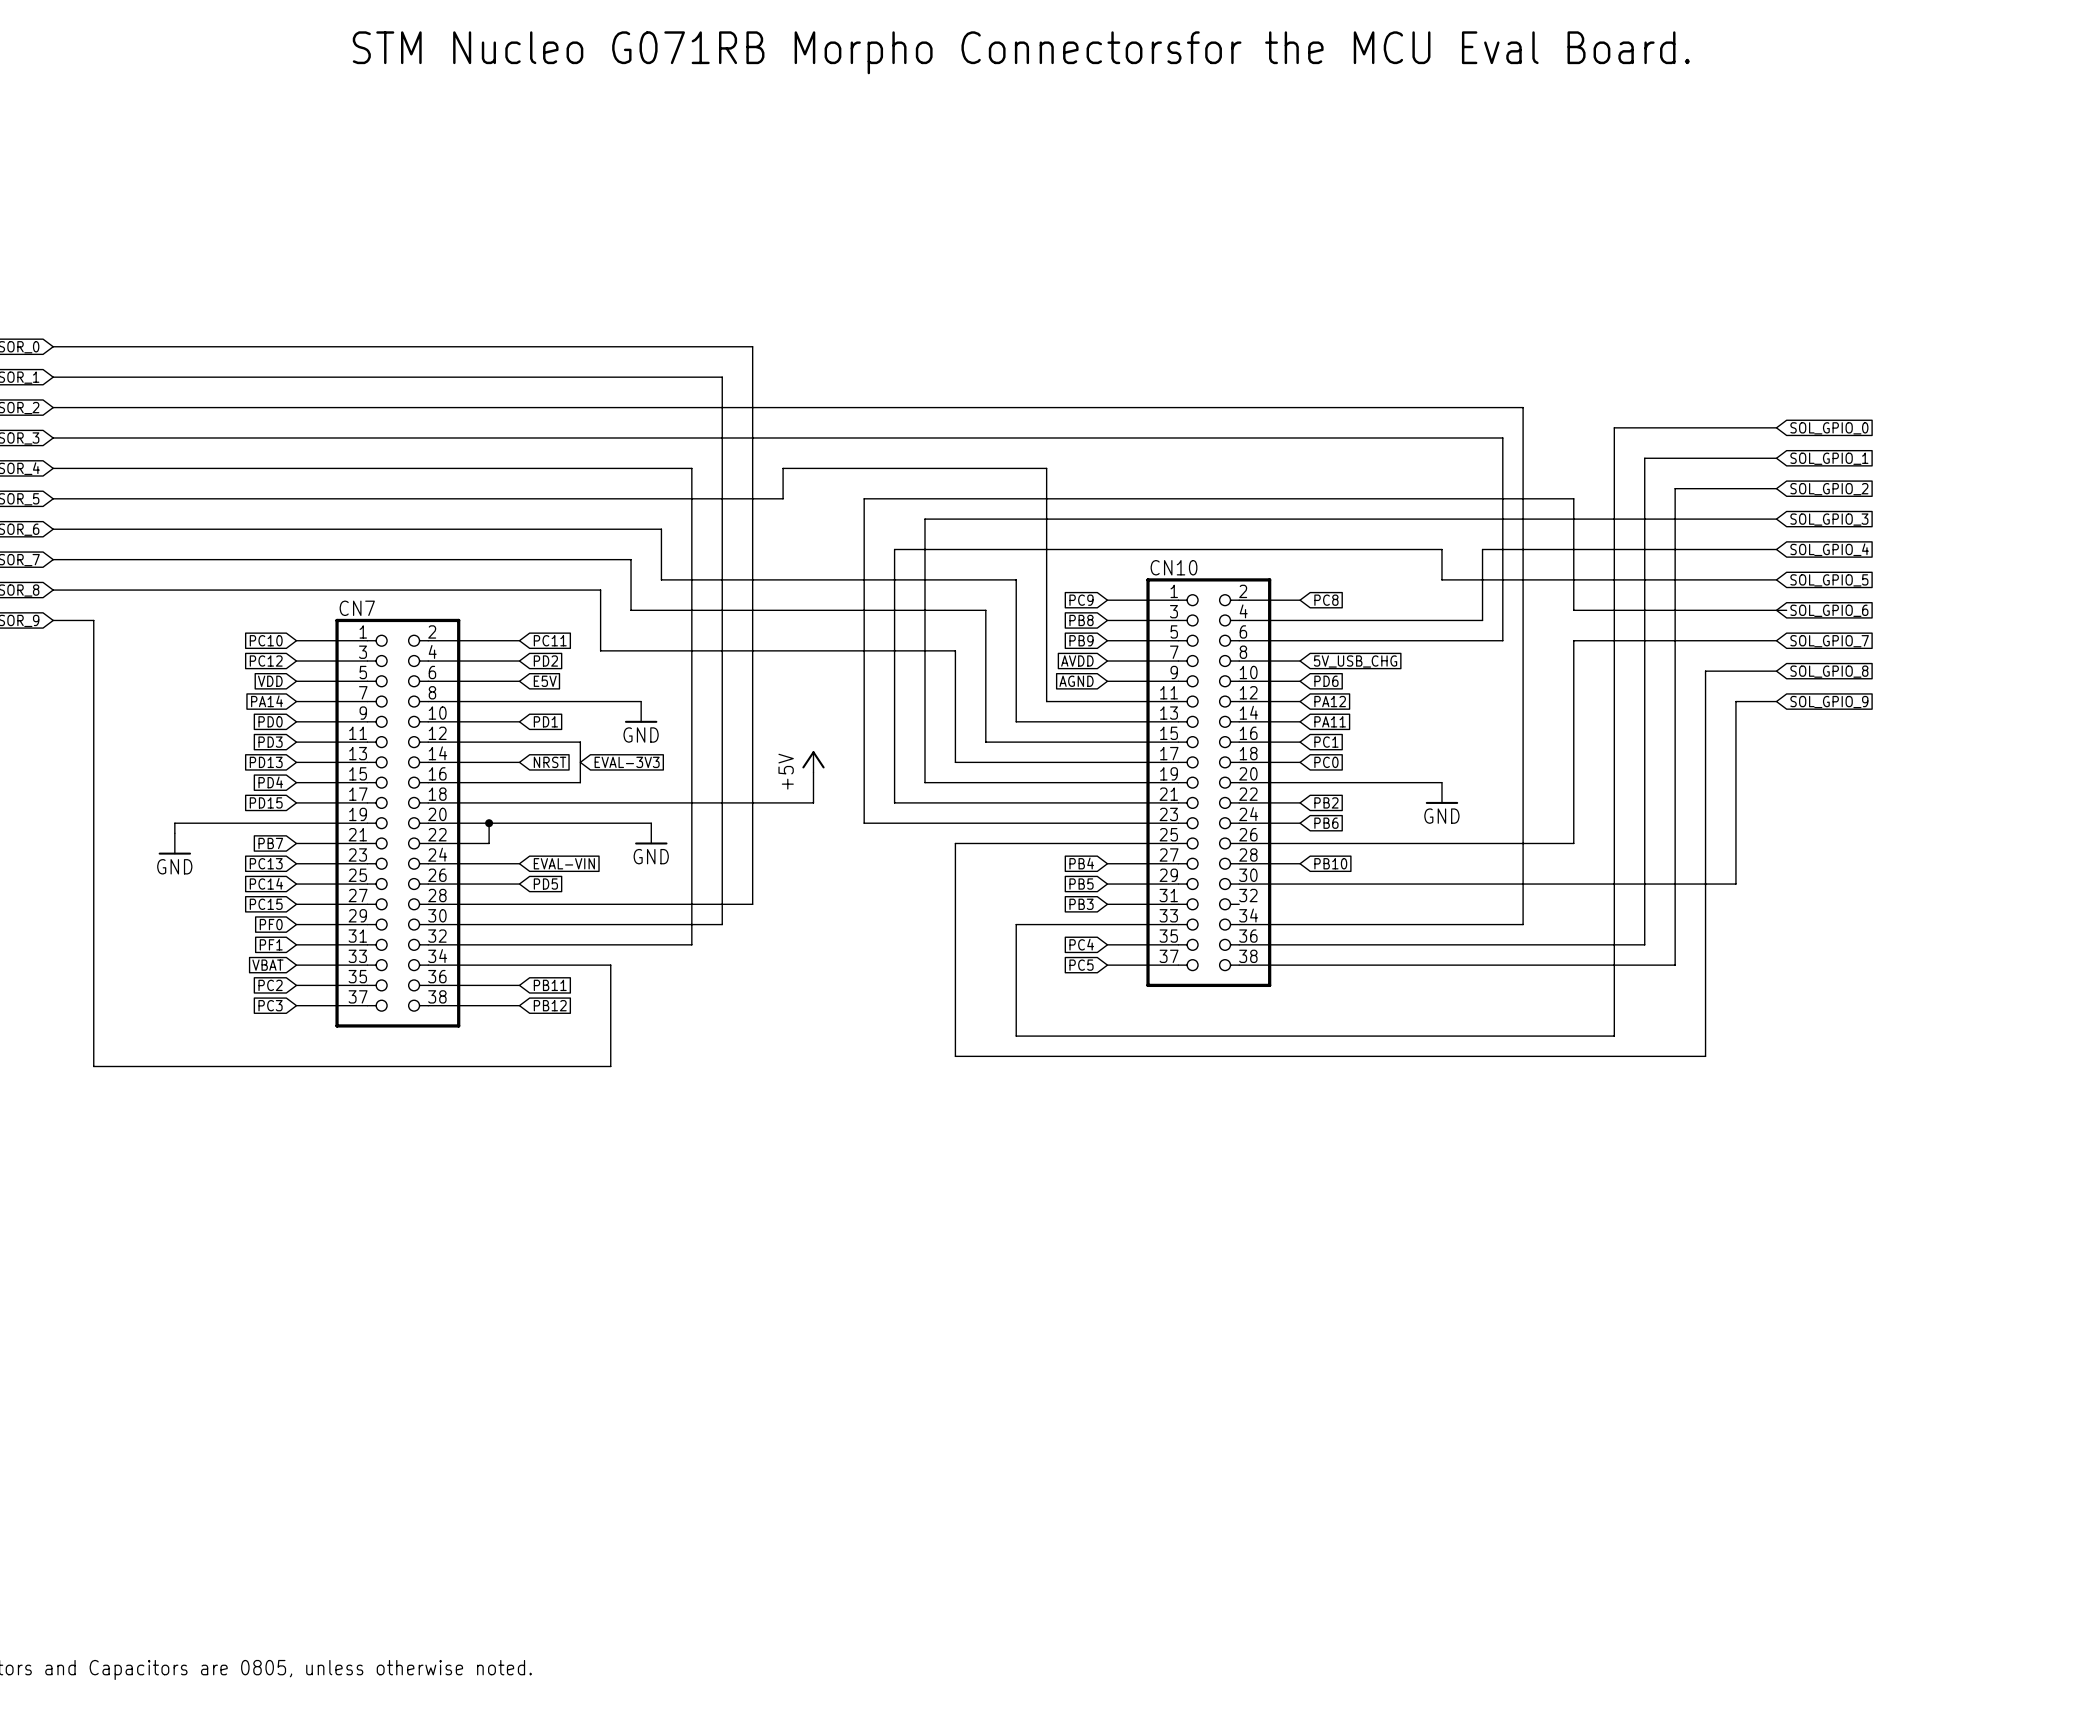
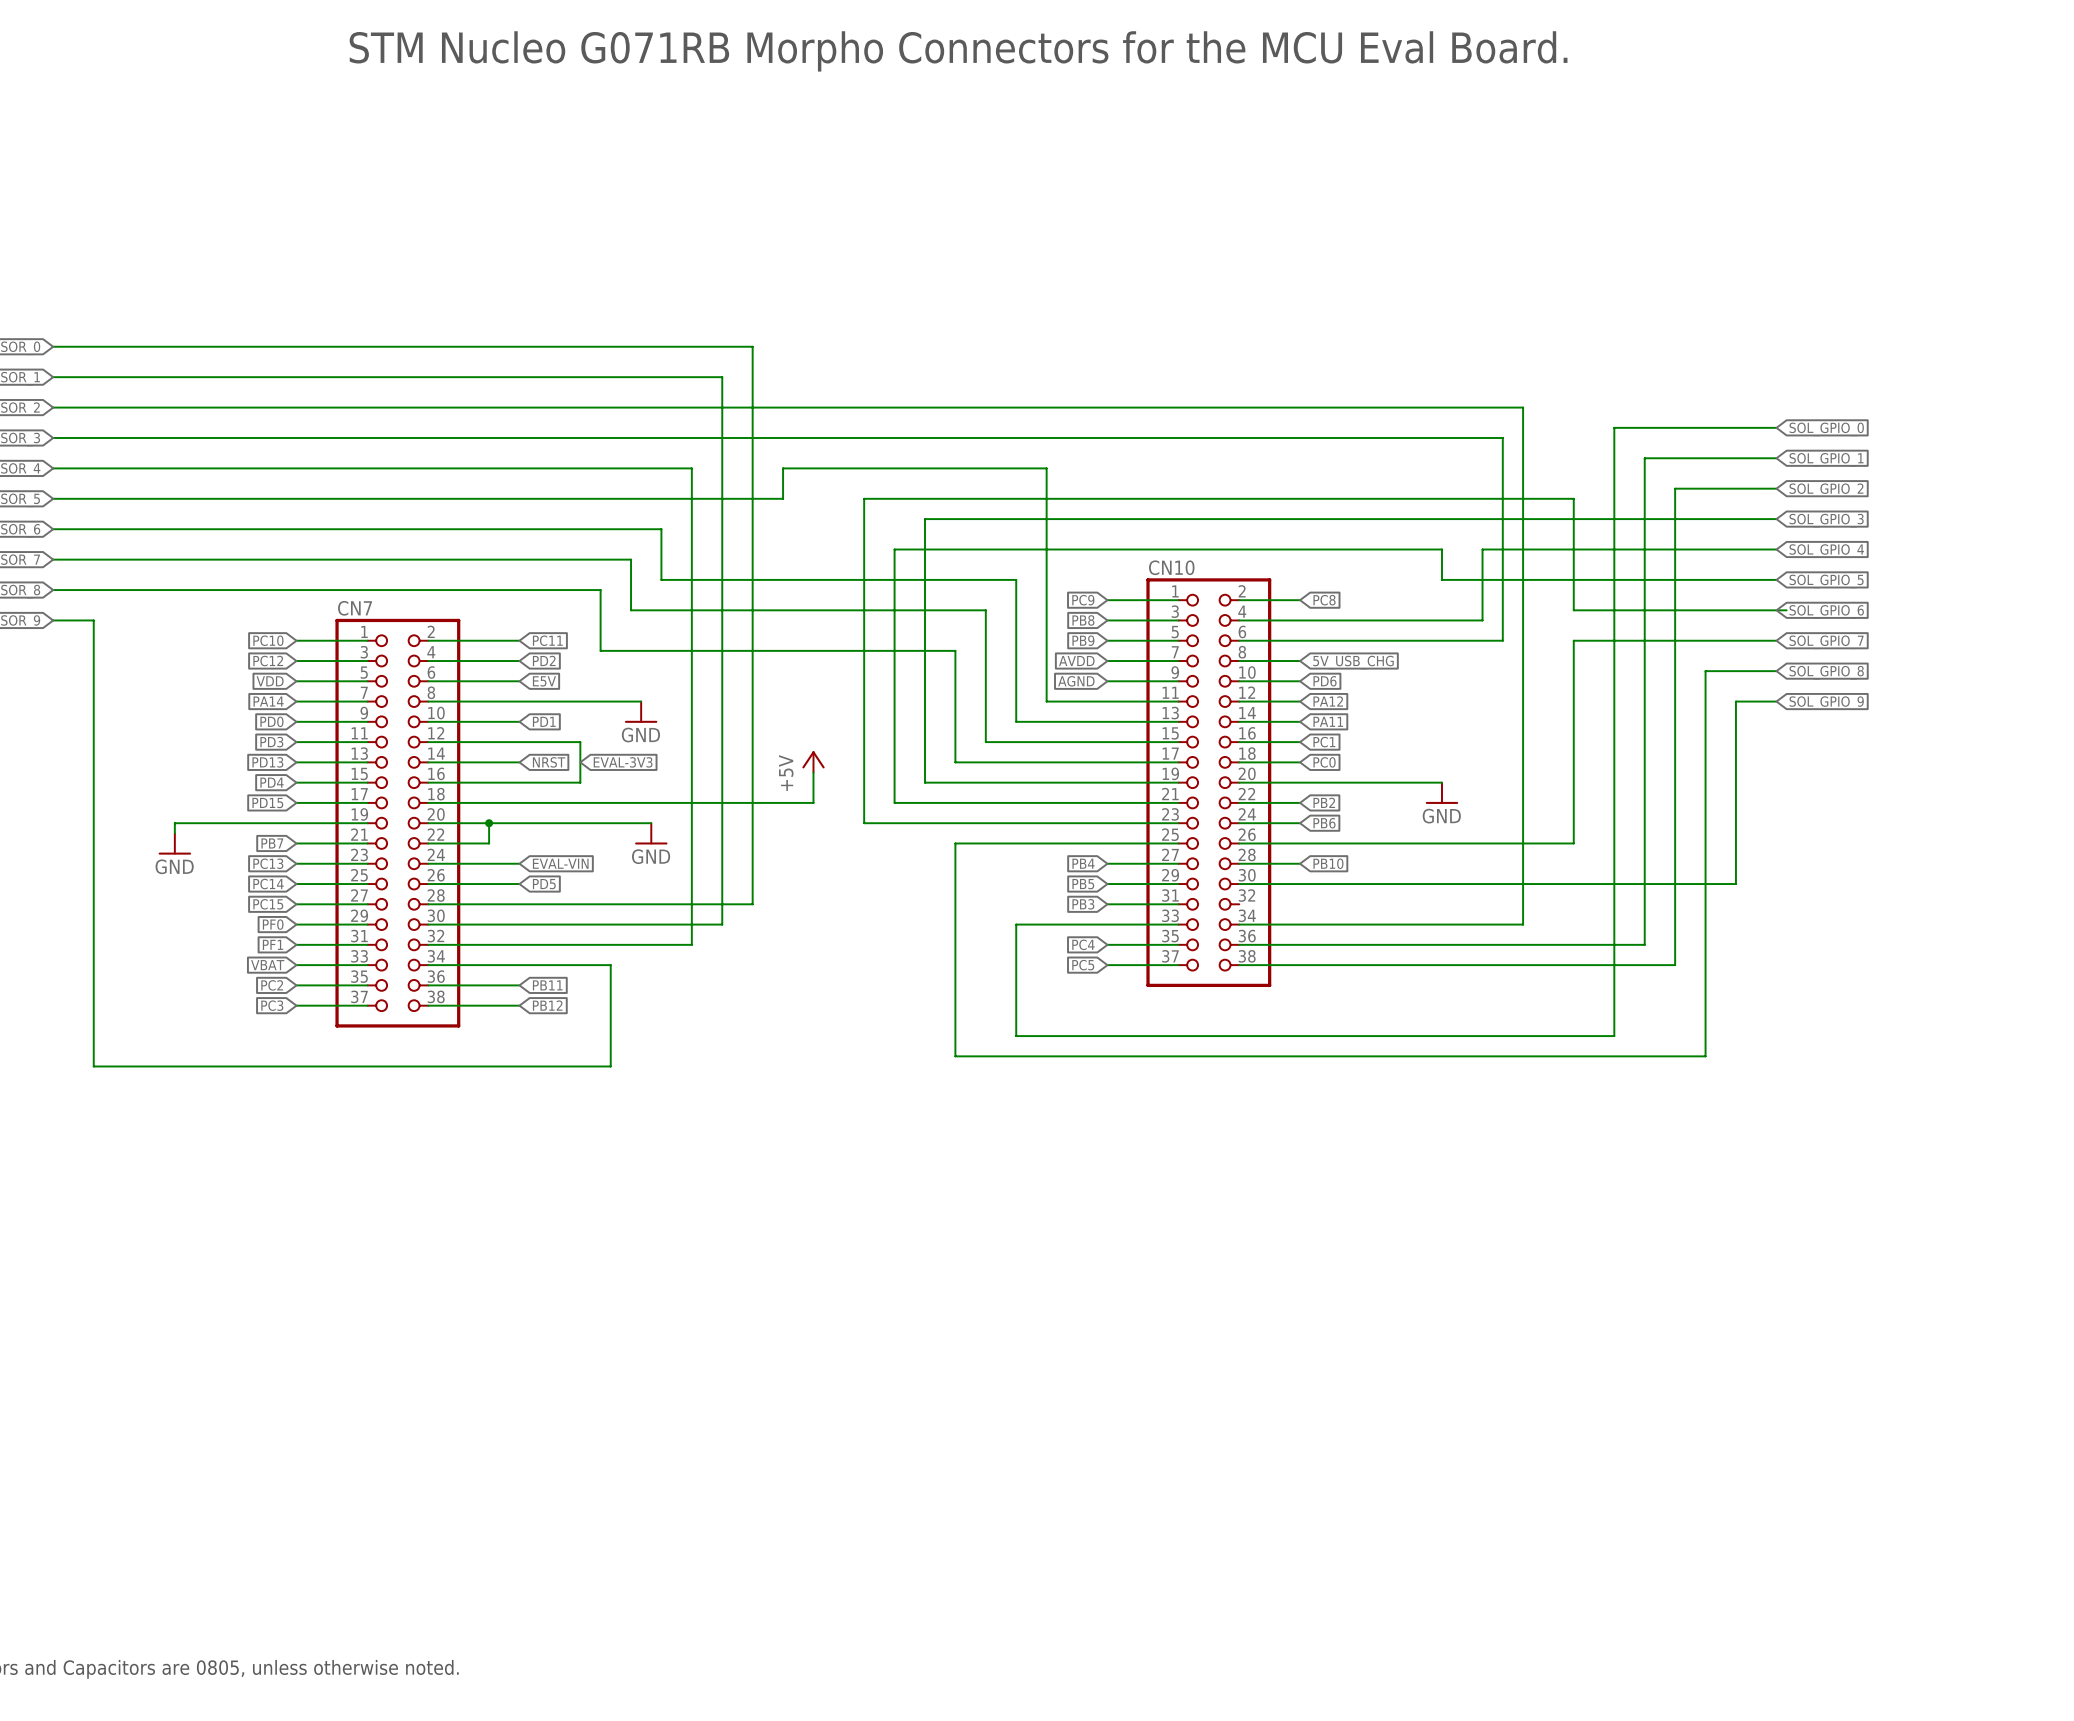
text: STM Nucleo G071RB Morpho Connectorsfor the MCU Eval Board. (1021, 52) -> STM Nucleo G071RB Morpho Connectors for the MCU Eval Board. (958, 51)

